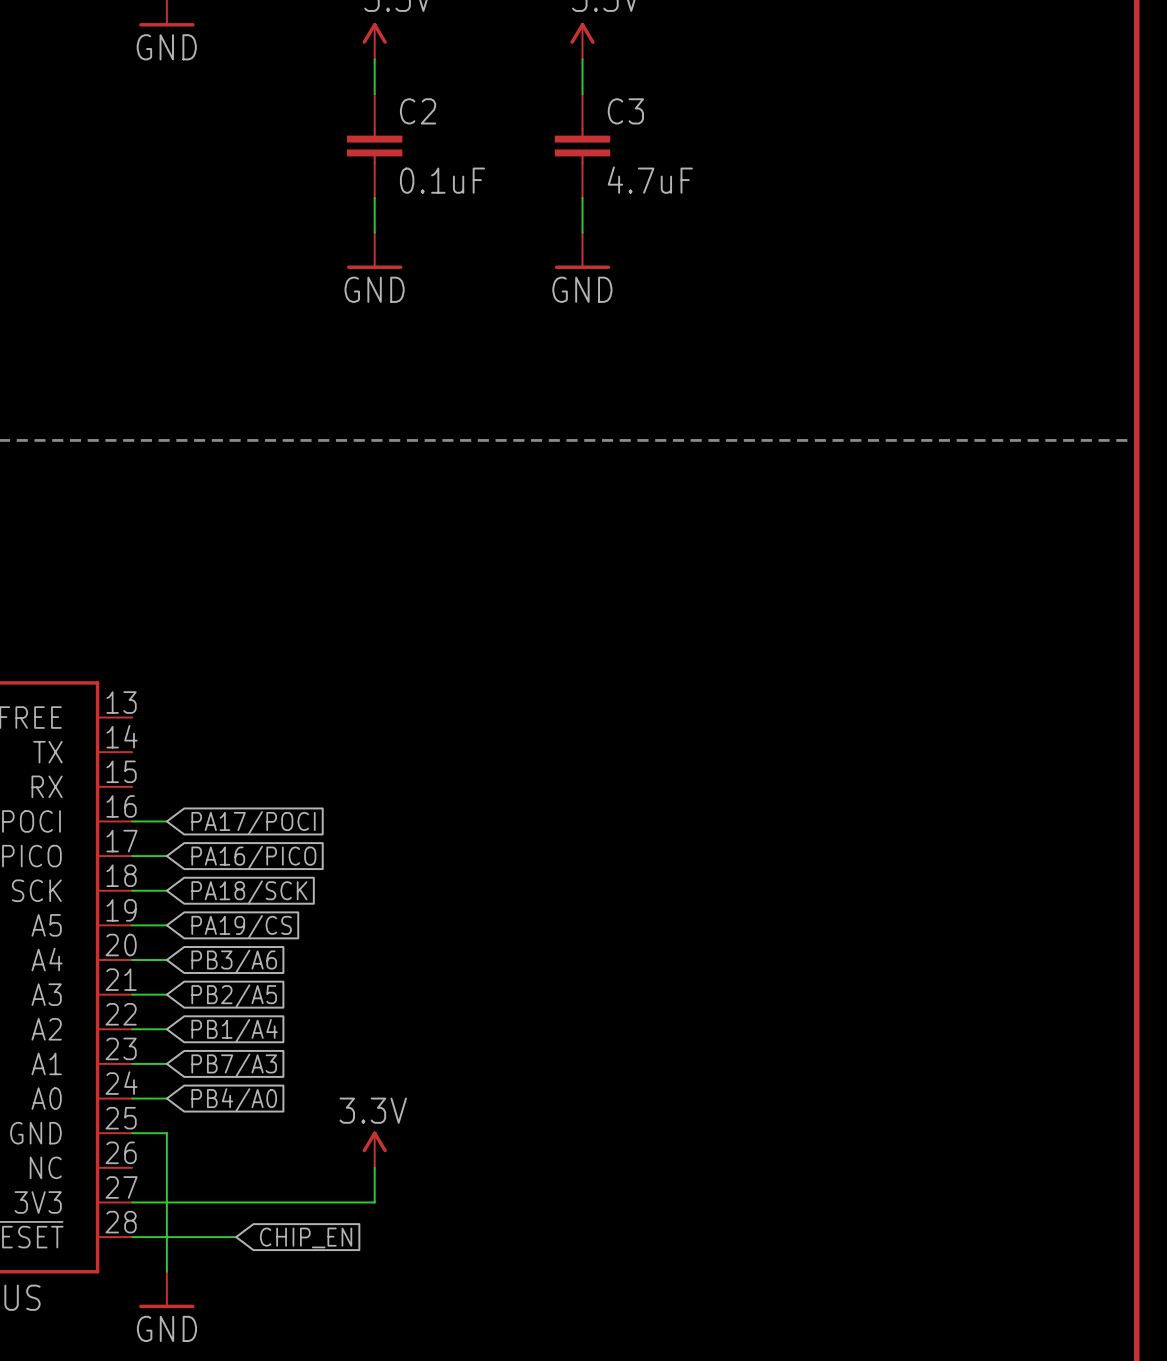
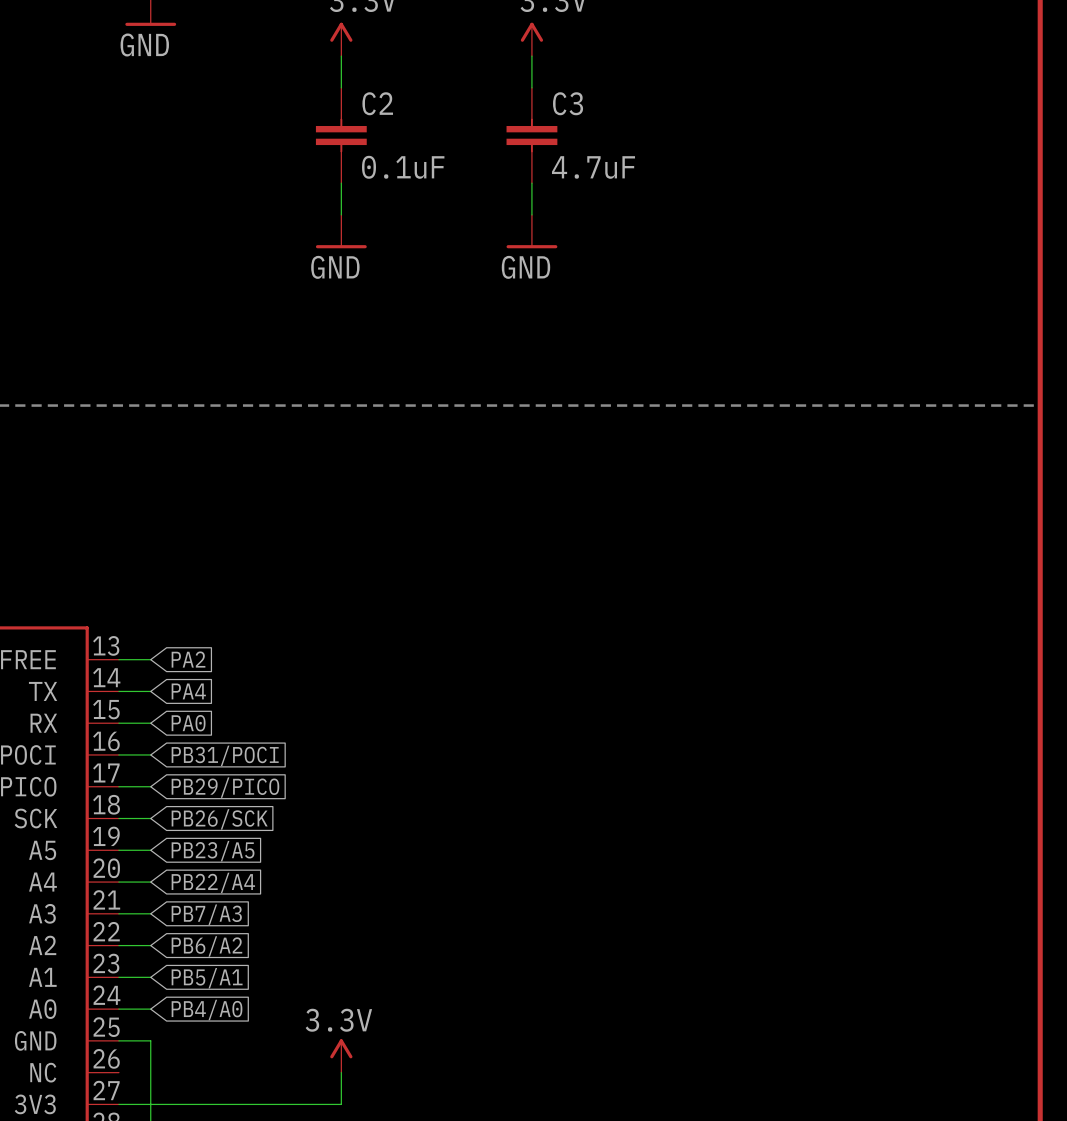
wire: none -> (118, 659) (150, 659)
global label: none -> PA2 (188, 659)
global label: none -> PA4 (188, 691)
wire: none -> (118, 691) (150, 691)
wire: none -> (118, 723) (150, 723)
global label: none -> PA0 (188, 723)
global label: PA17/POCI (253, 823) -> PB31/POCI (225, 755)
global label: PA16/PICO (253, 857) -> PB29/PICO (225, 787)
global label: PA18/SCK (249, 892) -> PB26/SCK (219, 819)
global label: PA19/CS (241, 927) -> PB23/A5 (213, 851)
global label: PB3/A6 (234, 961) -> PB22/A4 (213, 882)
global label: PB2/A5 (234, 996) -> PB7/A3 (206, 914)
global label: PB1/A4 (234, 1030) -> PB6/A2 (206, 946)
global label: PB7/A3 (234, 1065) -> PB5/A1 (207, 978)

